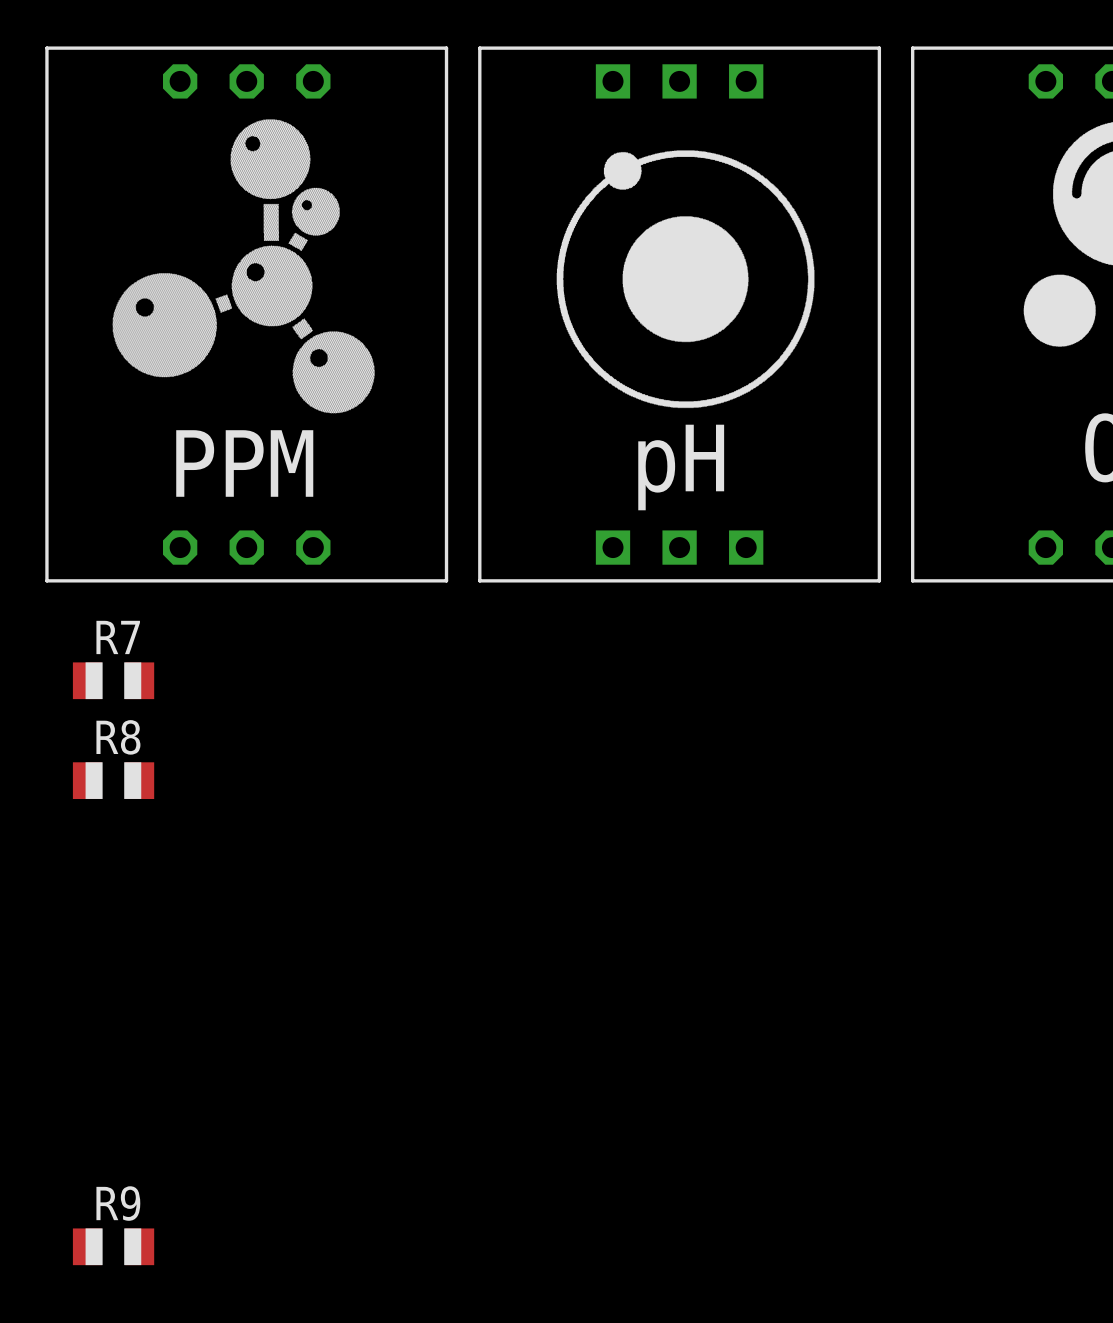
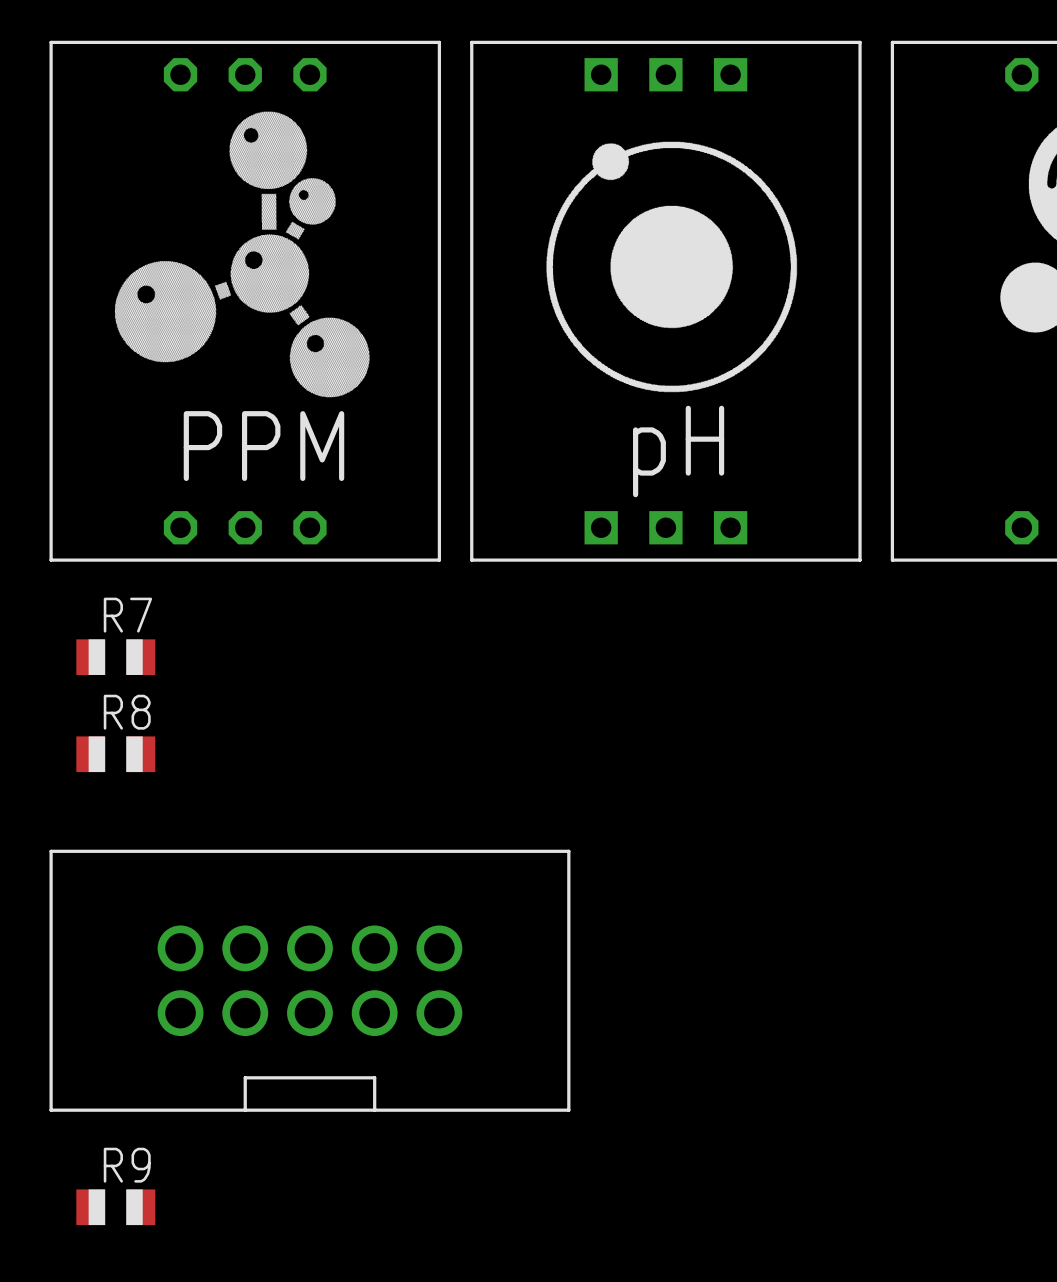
part: none -> (309, 980)

